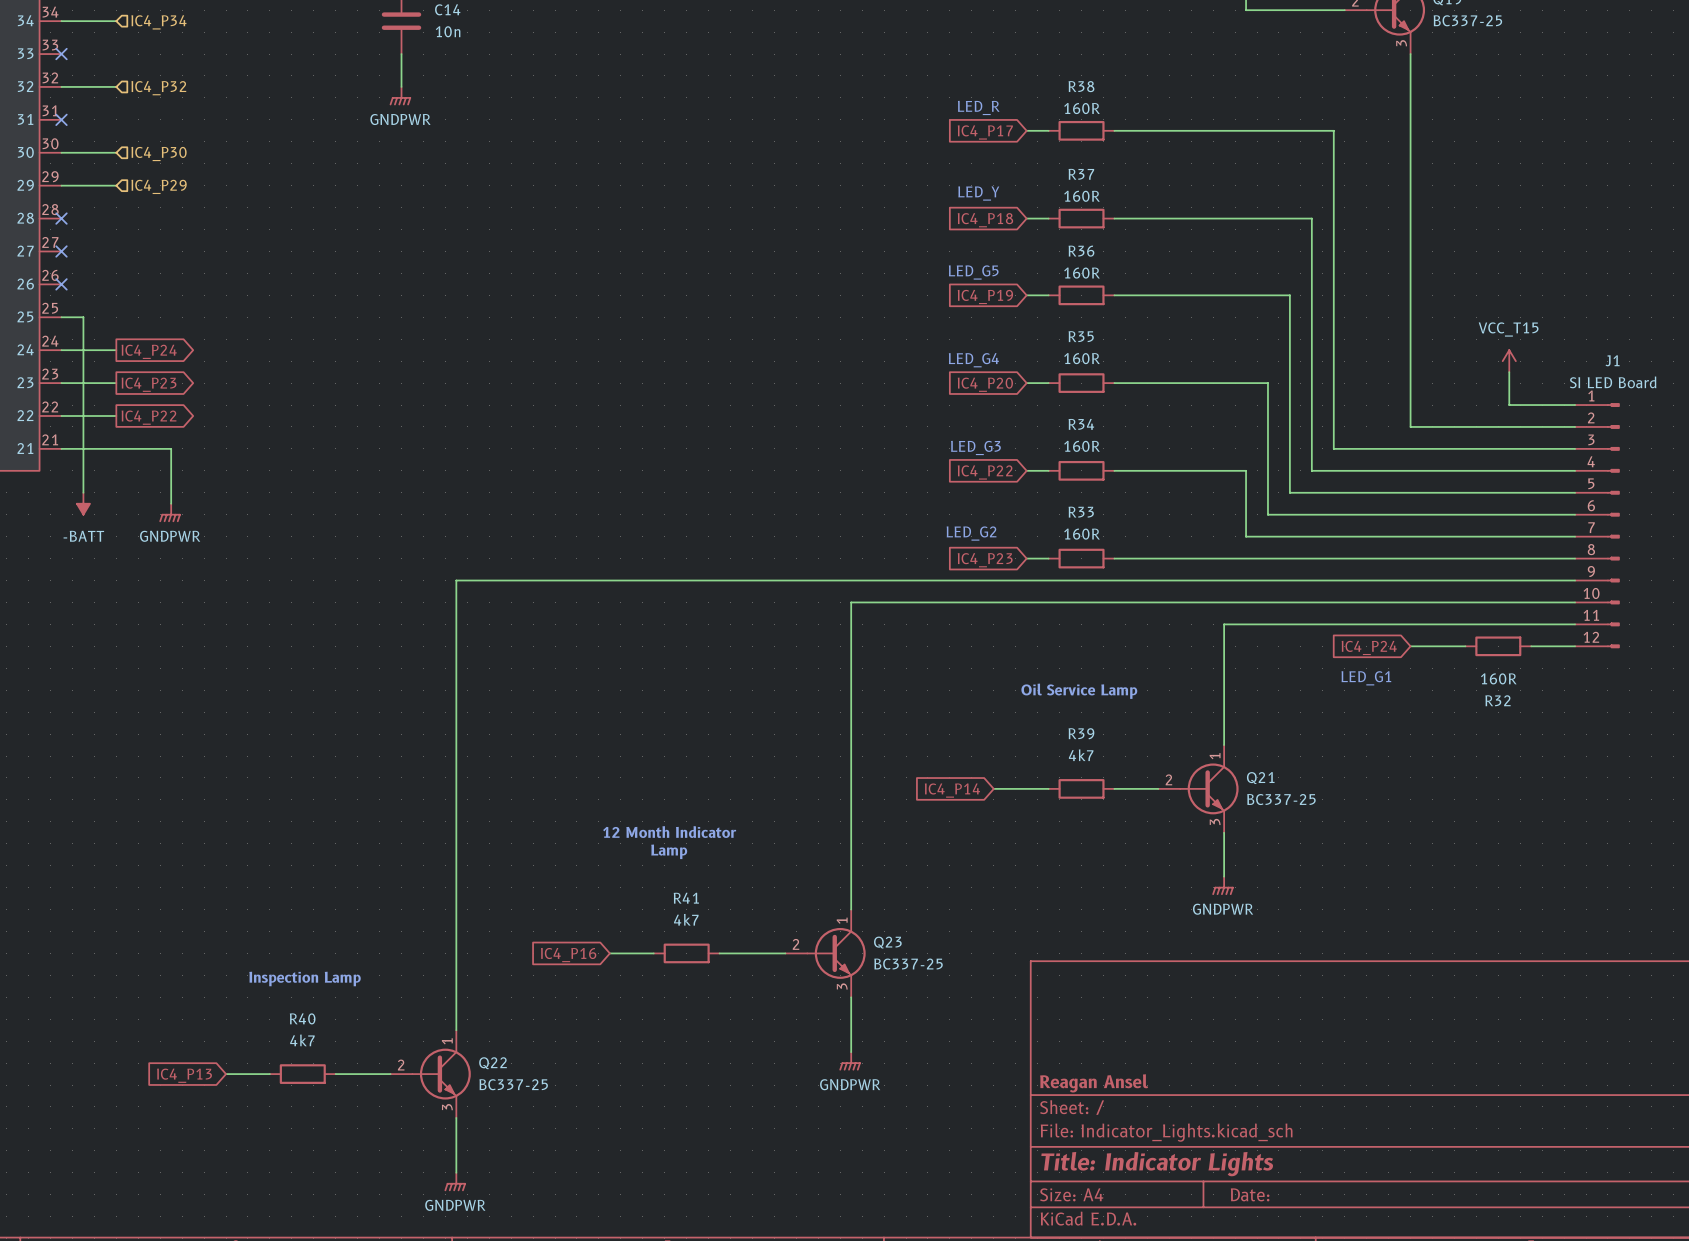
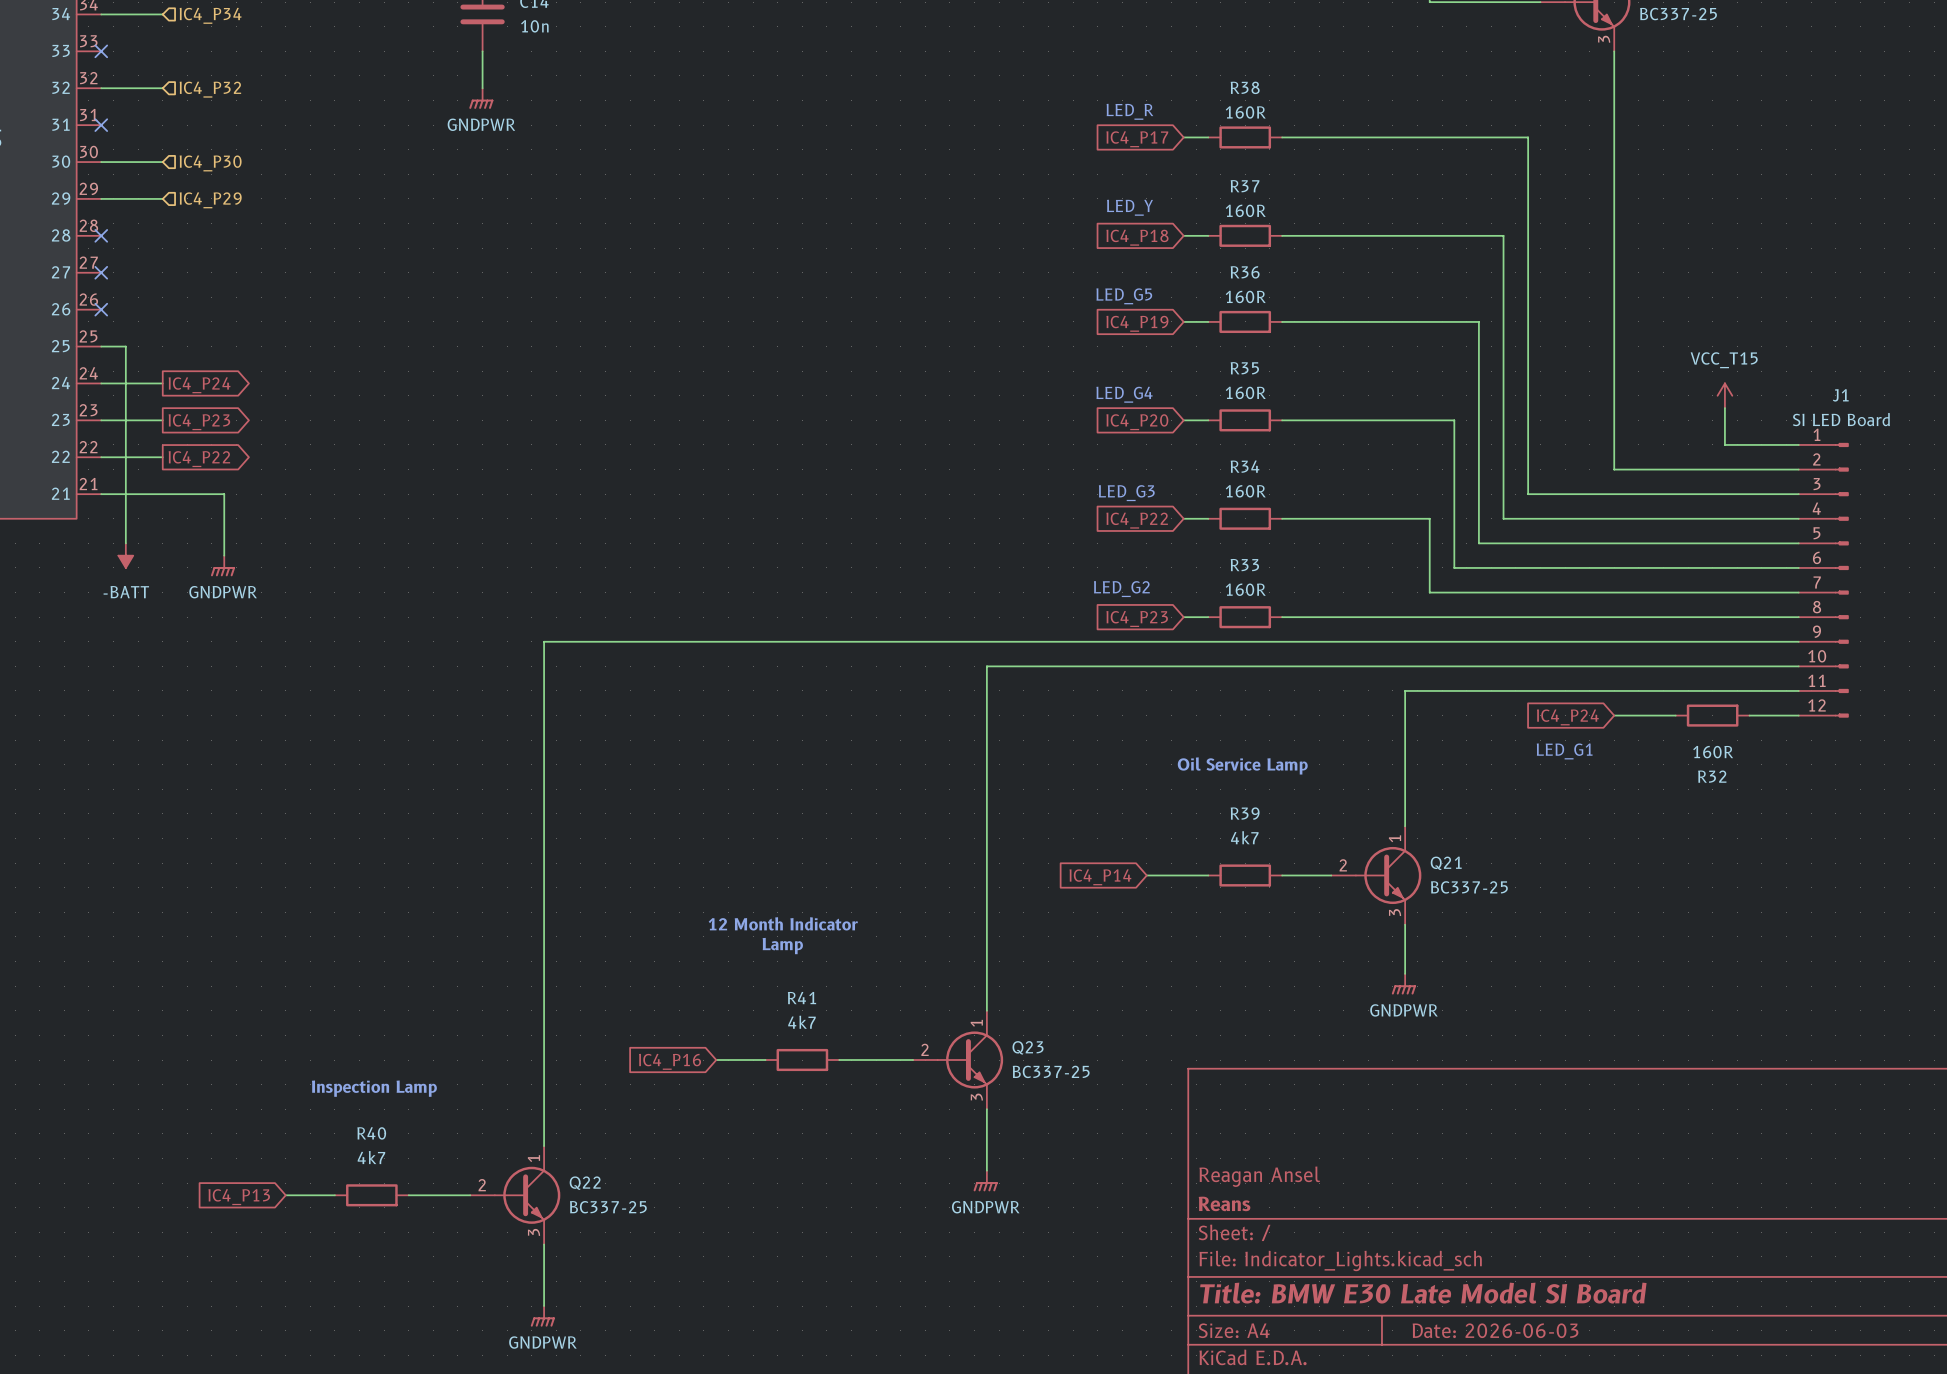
title block: none -> Reagan Ansel (1259, 1176)
title block: Reagan Ansel (1094, 1083) -> Reans (1224, 1203)
title block: Title: Indicator Lights (1157, 1164) -> Title: BMW E30 Late Model SI Board (1423, 1293)
title block: Date: (1250, 1194) -> Date: 2026-06-03 (1495, 1330)

